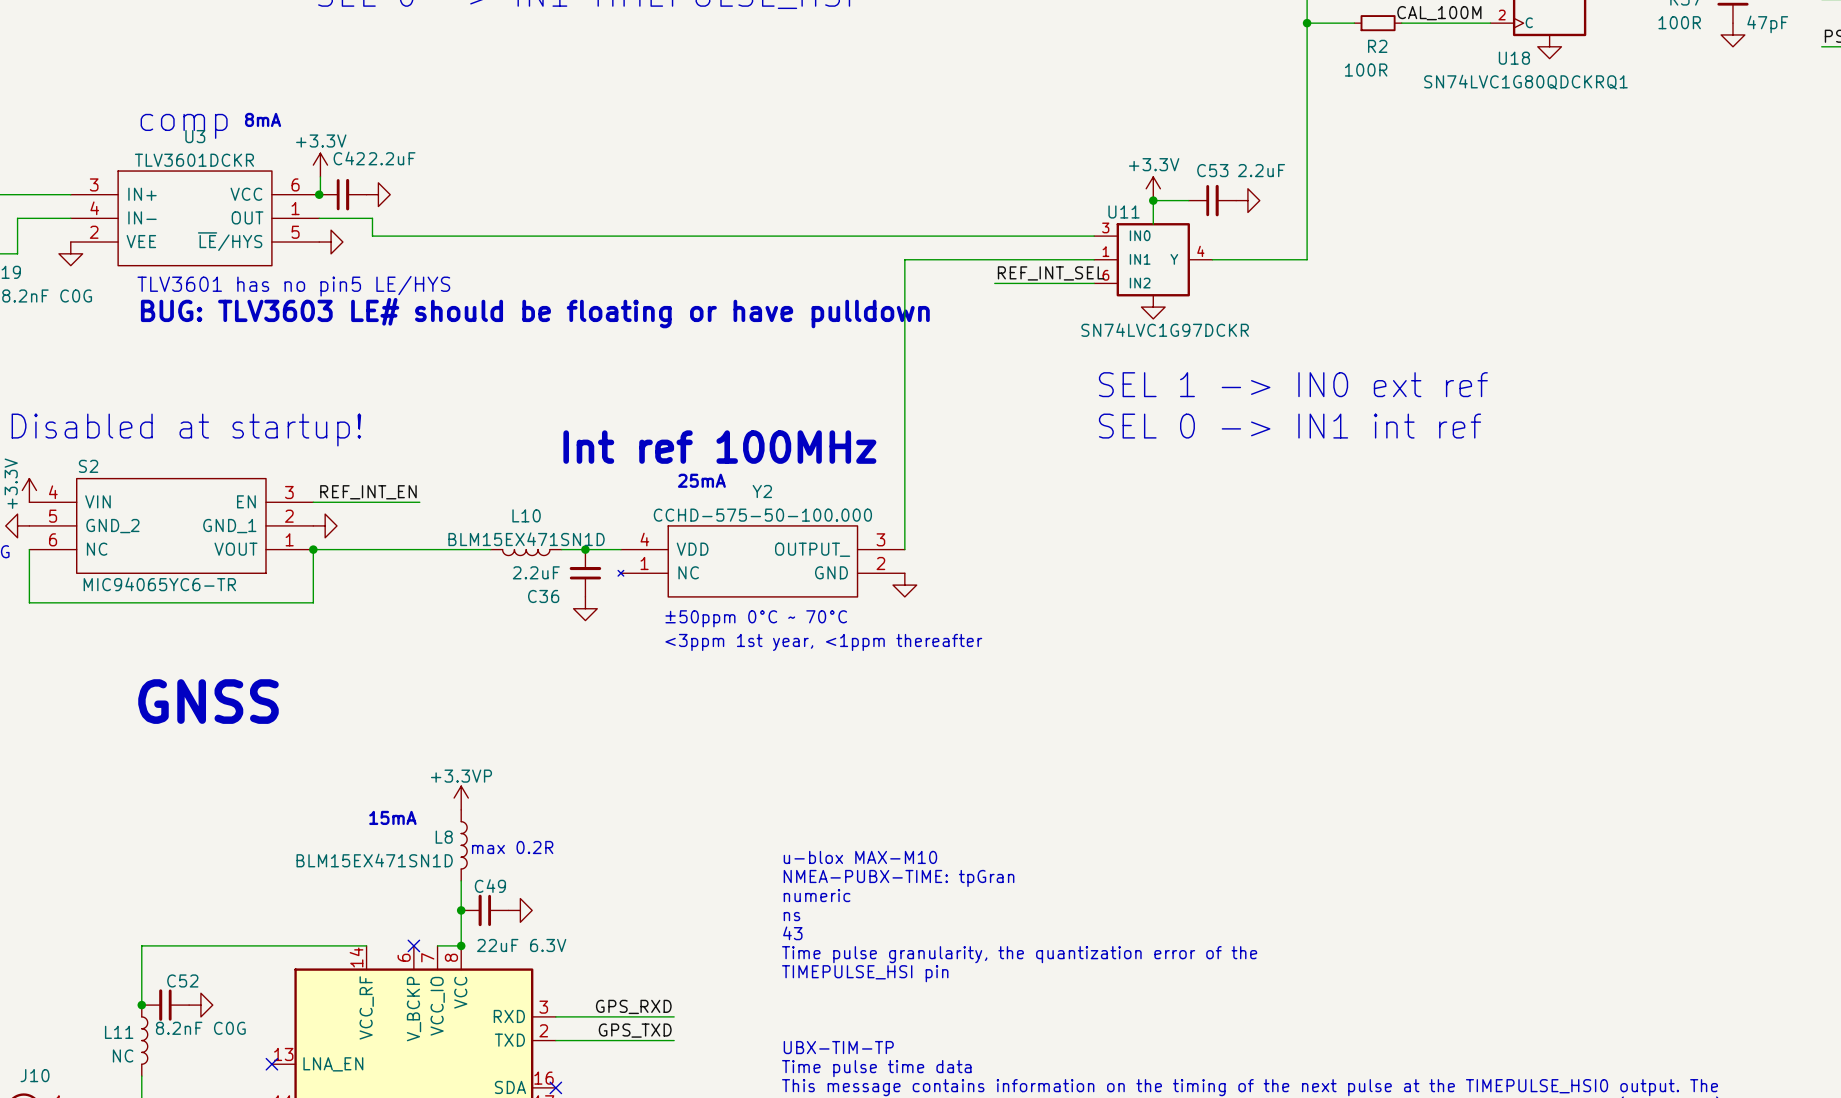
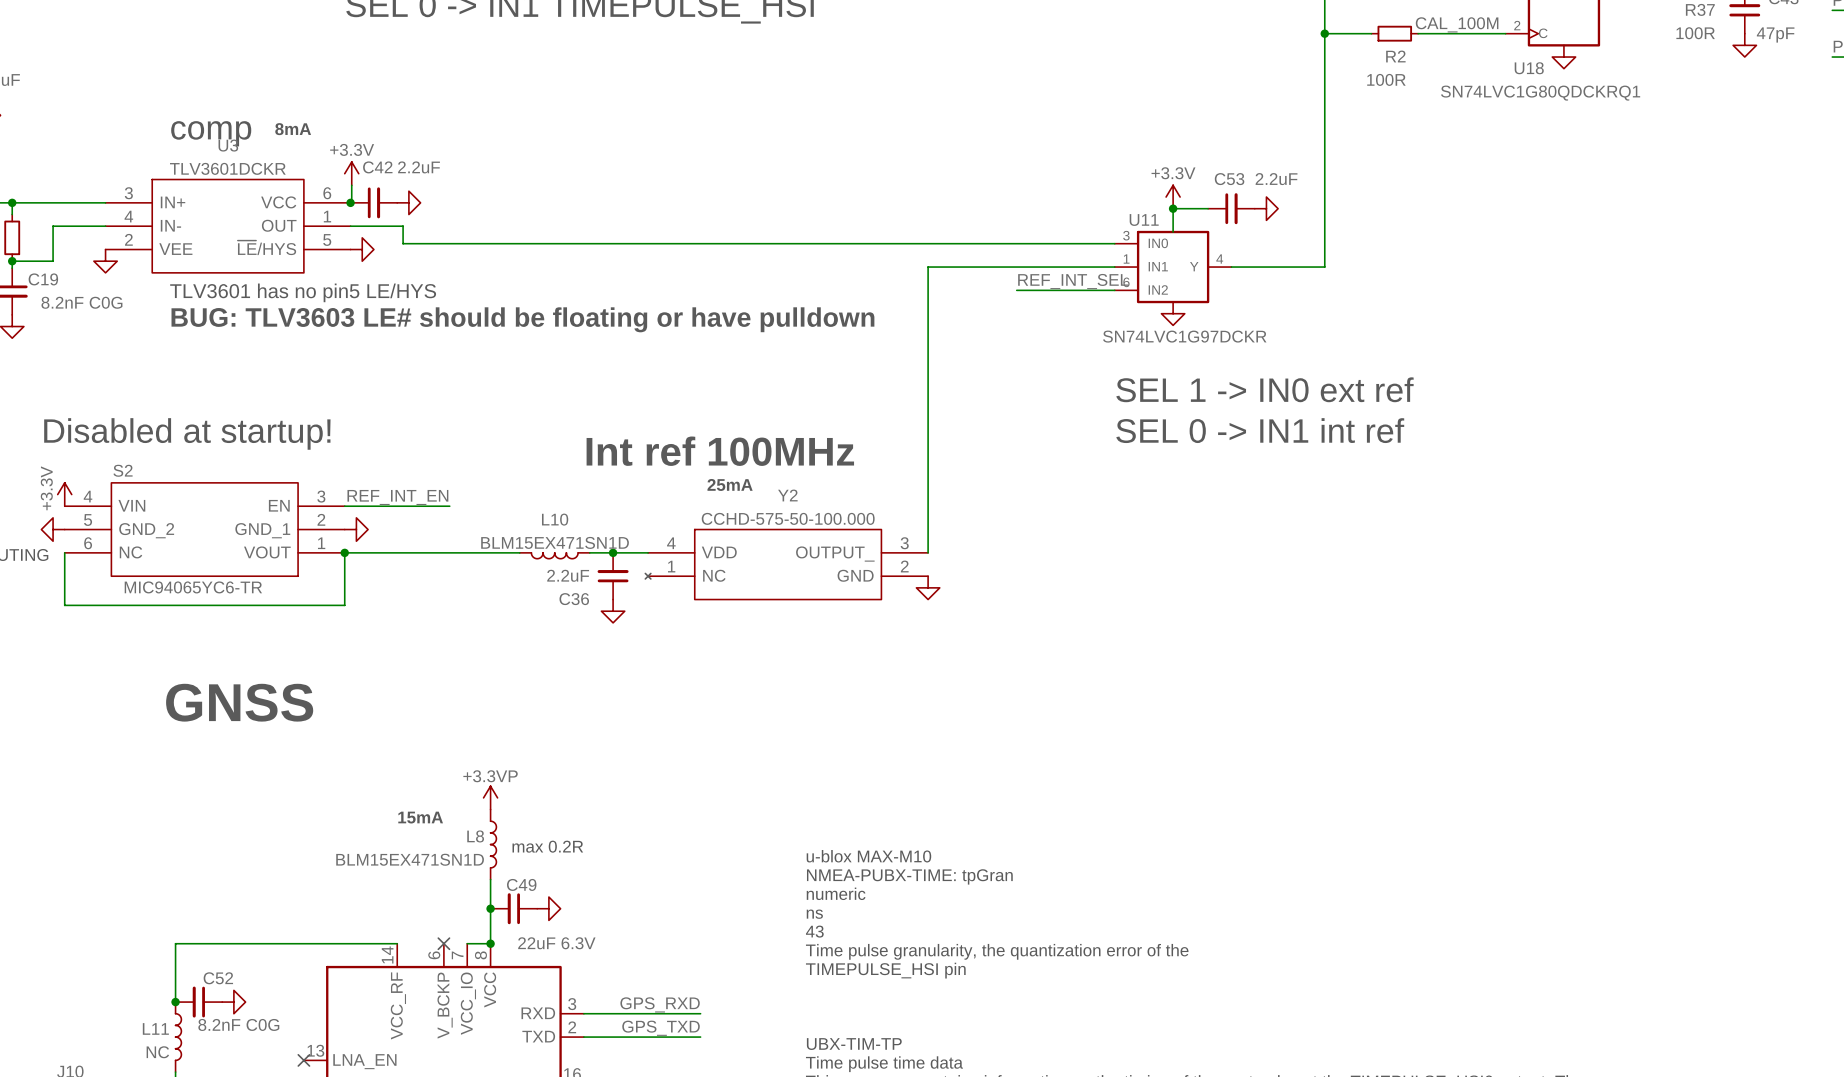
text: ±50ppm 0°C ~ 70°C (756, 618) -> none
text: <3ppm 1st year, <1ppm thereafter (823, 642) -> none

